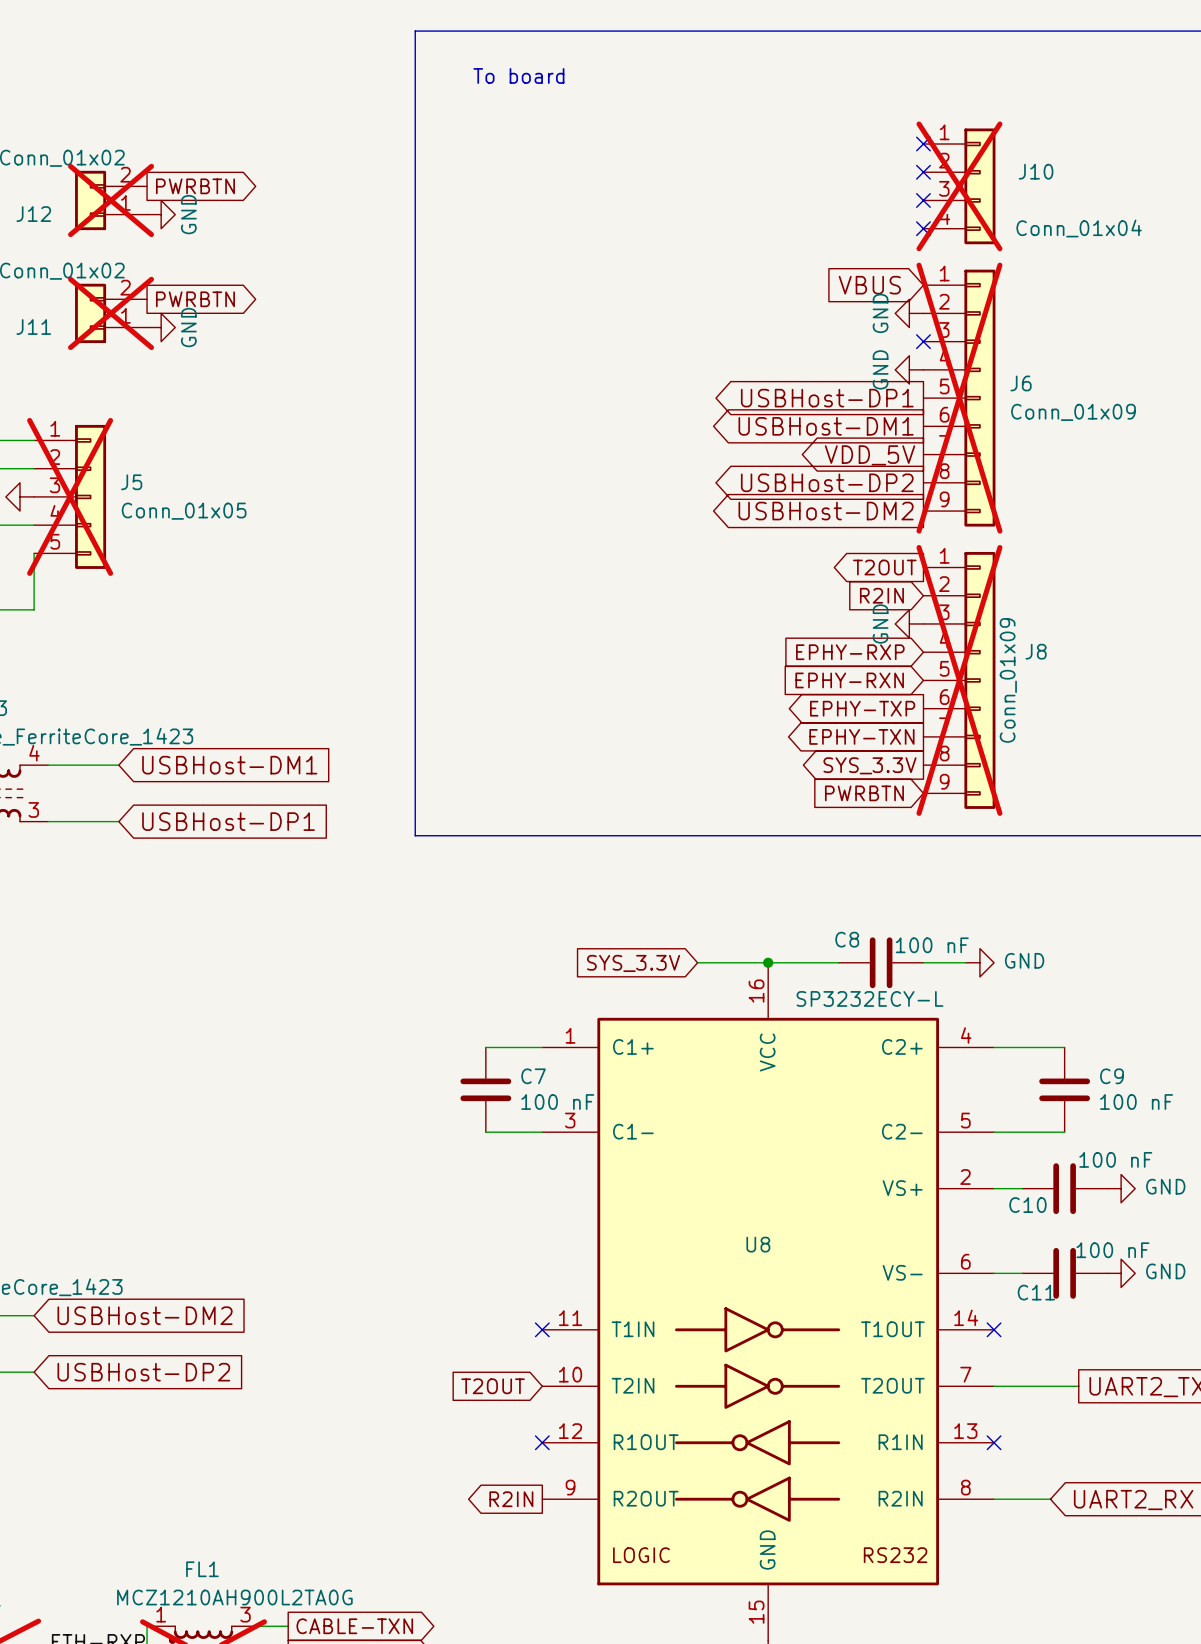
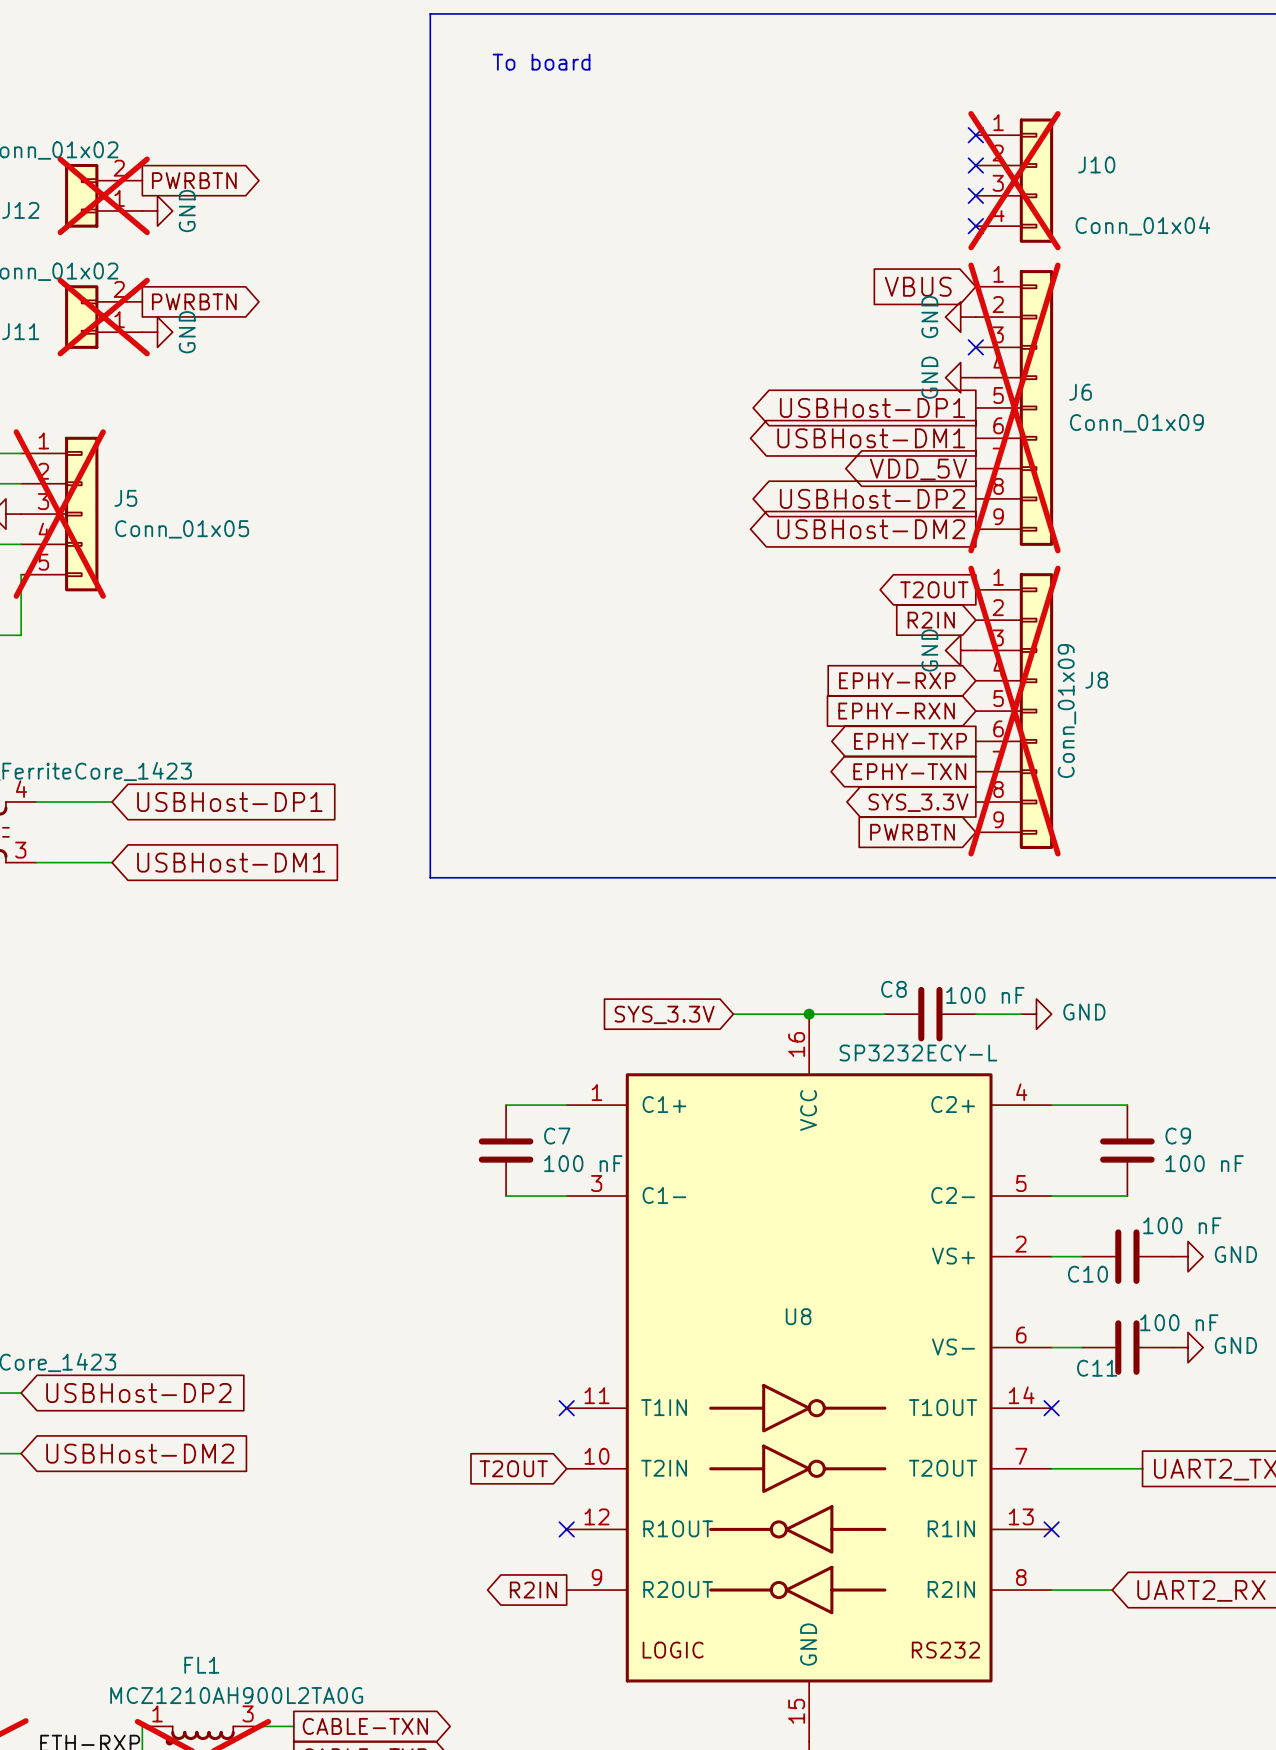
global label: USBHost-DM1 (229, 765) -> USBHost-DP1 (229, 802)
global label: USBHost-DP1 (228, 821) -> USBHost-DM1 (231, 862)
global label: USBHost-DM2 (145, 1315) -> USBHost-DP2 (138, 1393)
global label: USBHost-DP2 (143, 1372) -> USBHost-DM2 (140, 1453)

